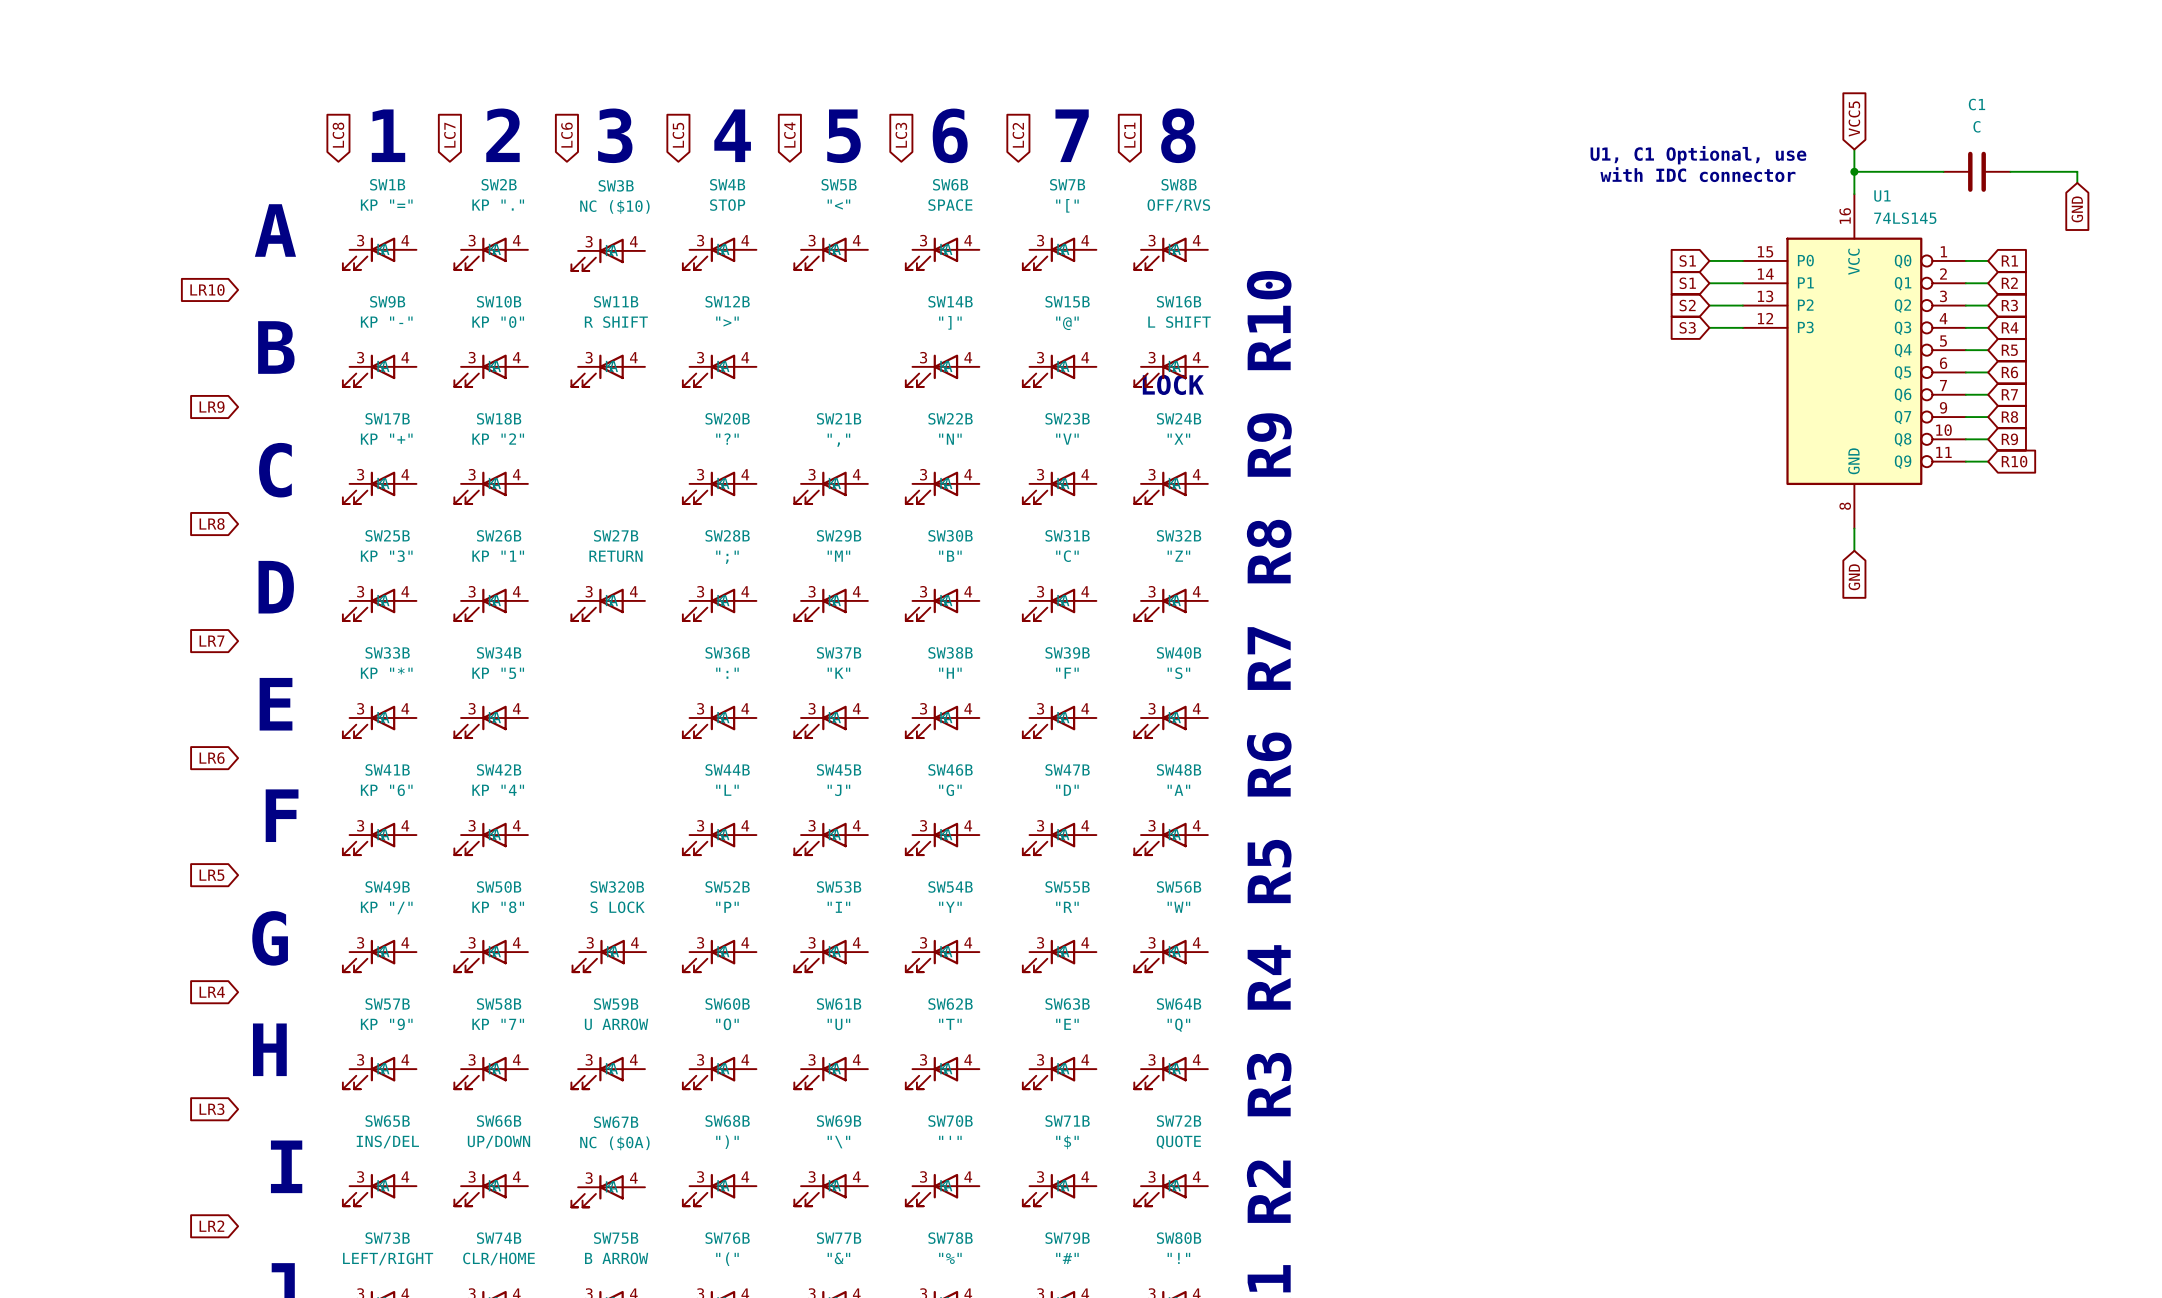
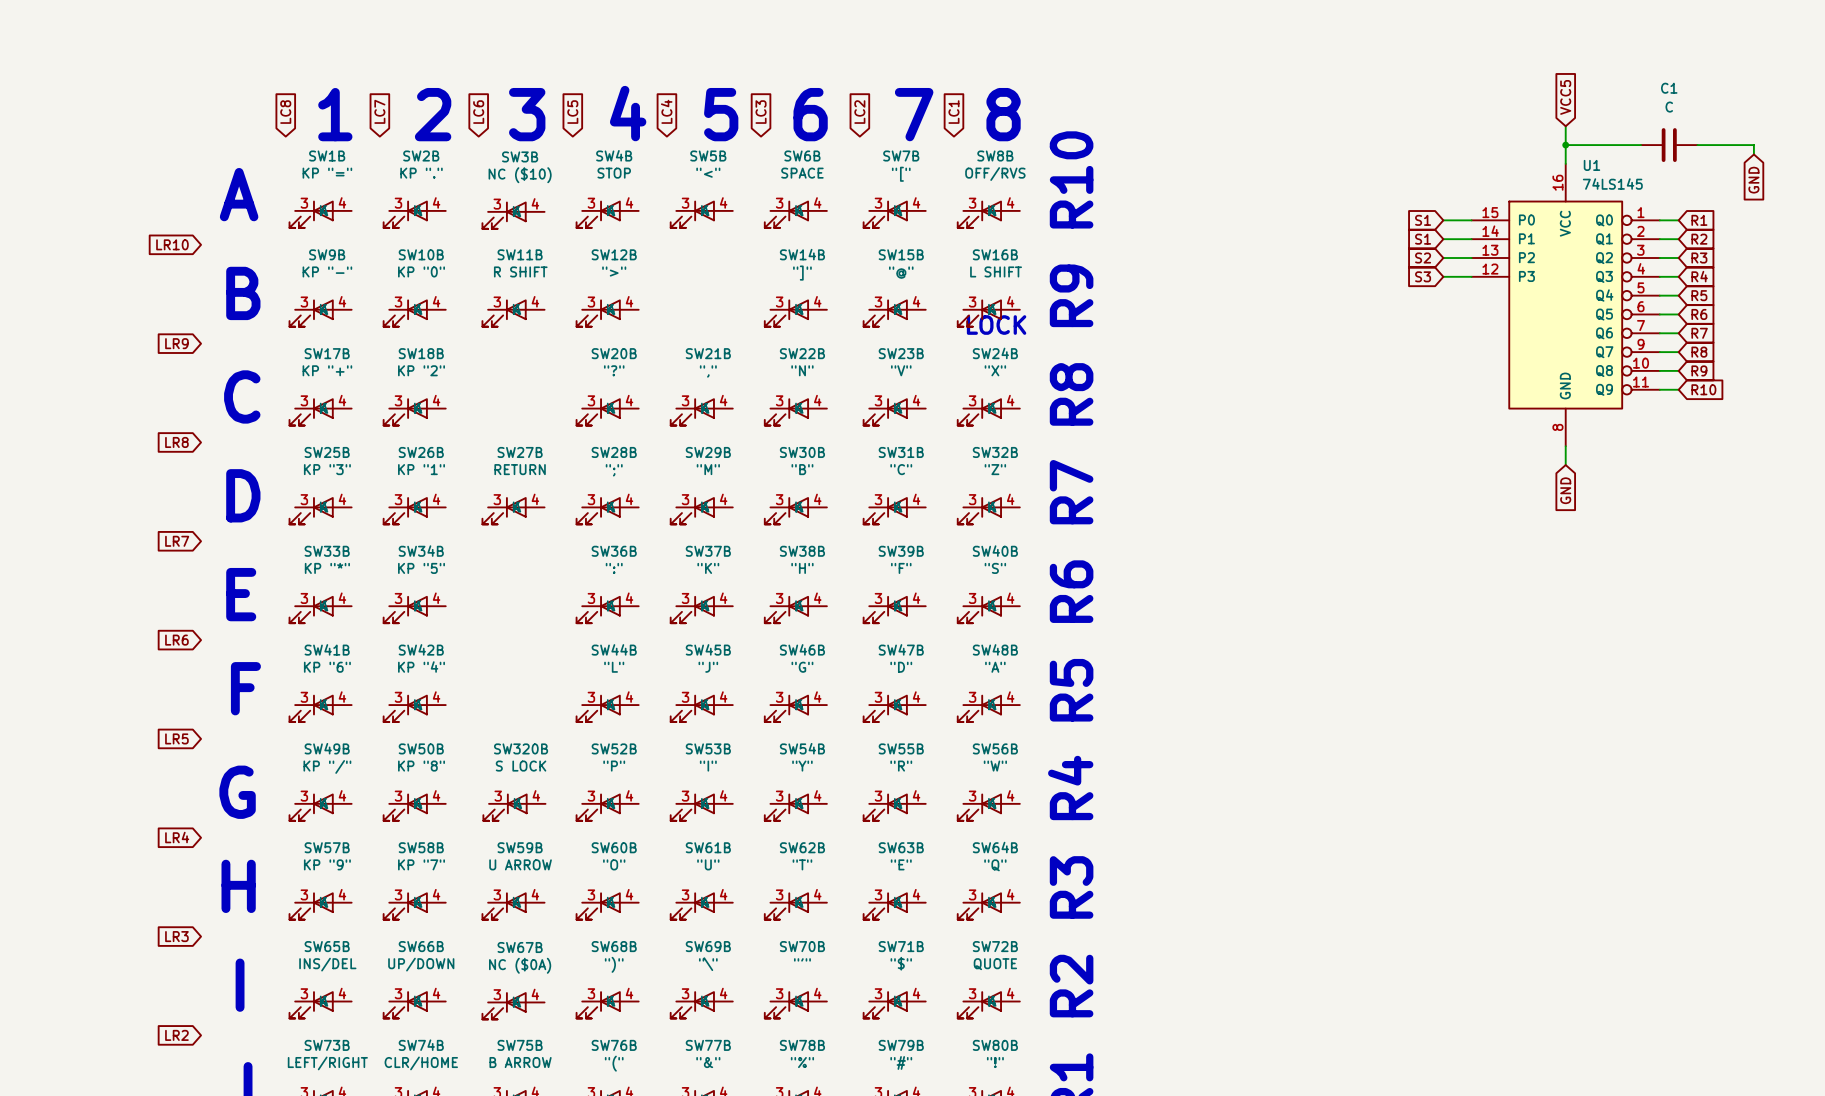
text: U1, C1 Optional, use (1698, 155) -> none
text: with IDC connector (1697, 174) -> none

